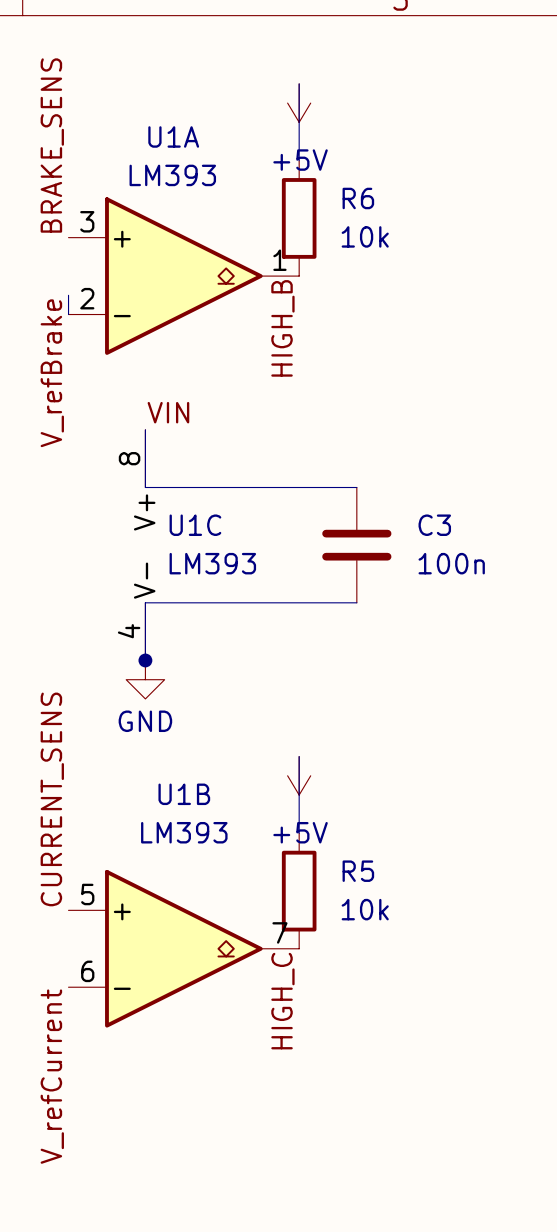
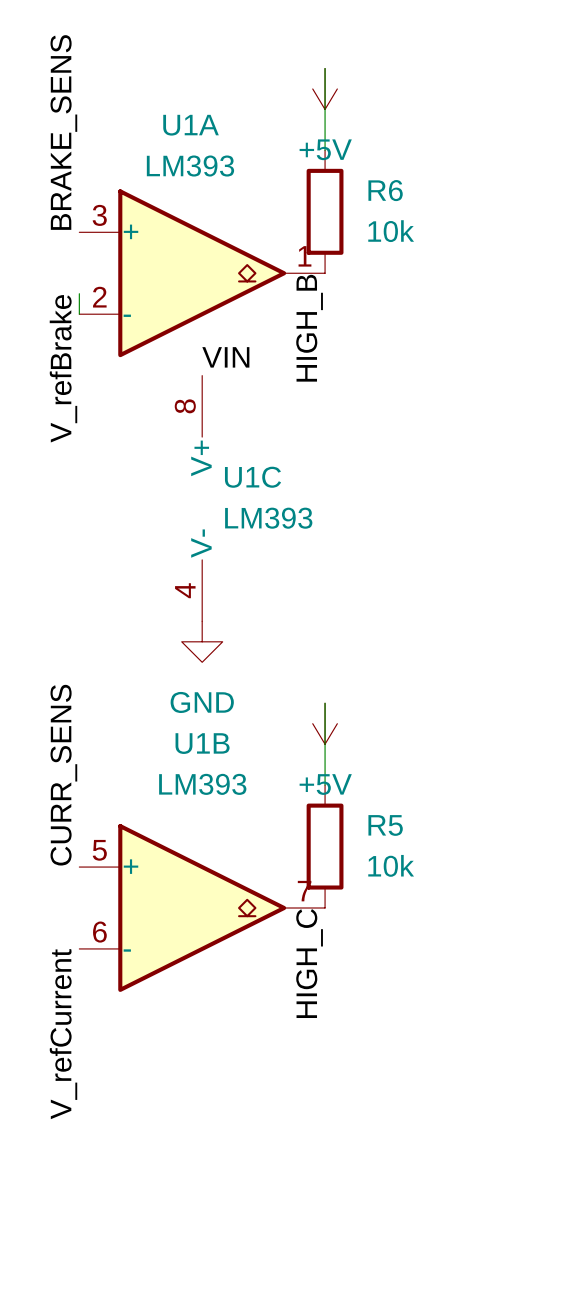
label position: VIN (168, 412) -> VIN (225, 357)
wire: (145, 429) (145, 487) (356, 487) -> none
U1C position: (145, 545) -> (202, 498)
C3: 100n (356, 545) -> none
wire: (356, 602) (145, 602) (145, 660) -> none
junction: (145, 660) -> none
power symbol position: GND (145, 679) -> GND (202, 641)
power symbol text position: GND (145, 721) -> GND (202, 702)
label: none -> CURR_SENS (63, 775)
wire: (299, 756) (299, 833) -> (325, 785) (325, 703)
power symbol position: +5V (299, 775) -> +5V (325, 723)
label: CURRENT_SENS (52, 799) -> V_refCurrent (63, 1034)
R5 position: (299, 891) -> (325, 846)
U1B position: (183, 948) -> (202, 908)
label position: HIGH_C (282, 1001) -> HIGH_C (309, 963)
label: V_refCurrent (52, 1076) -> none

